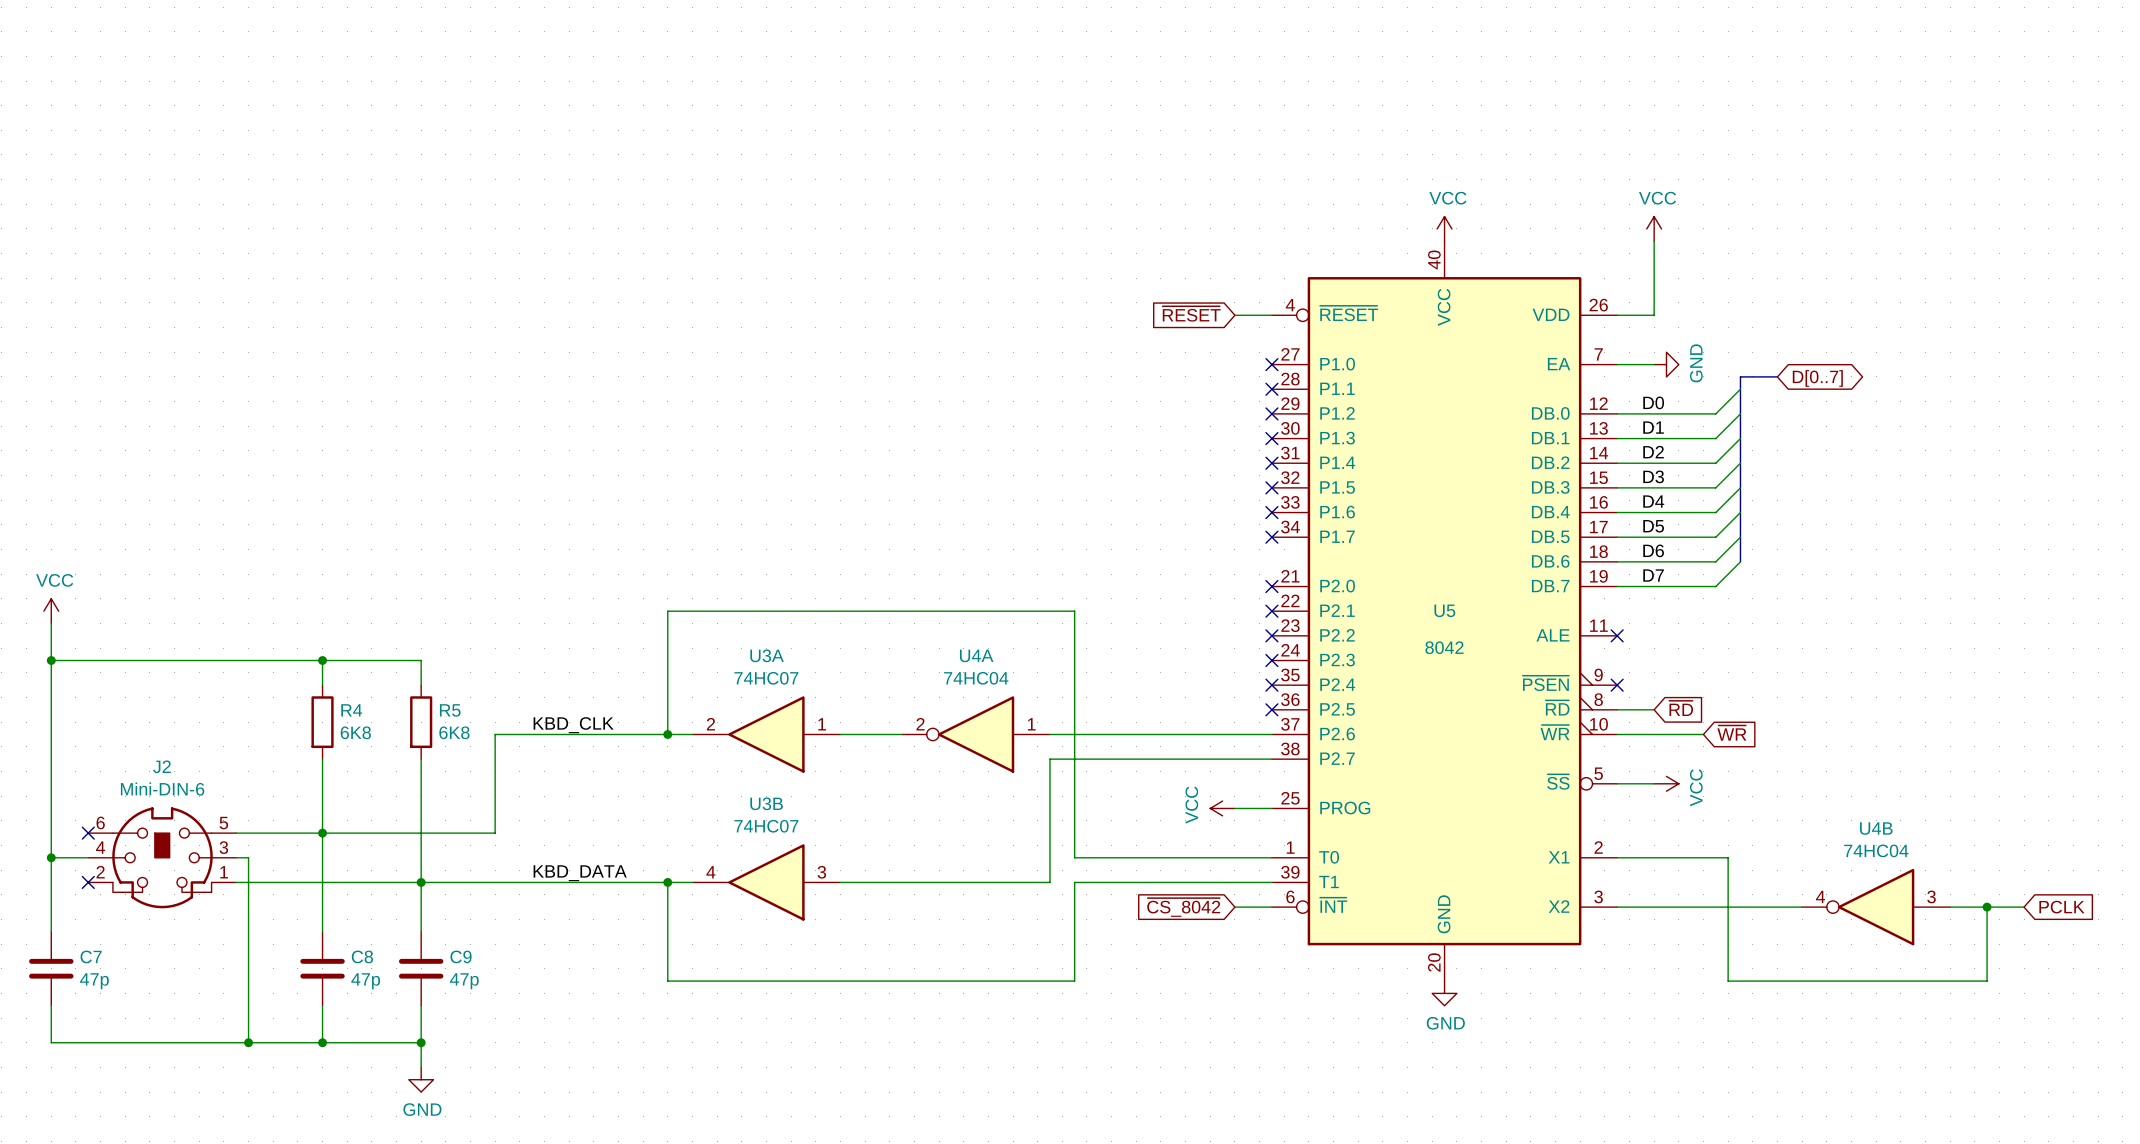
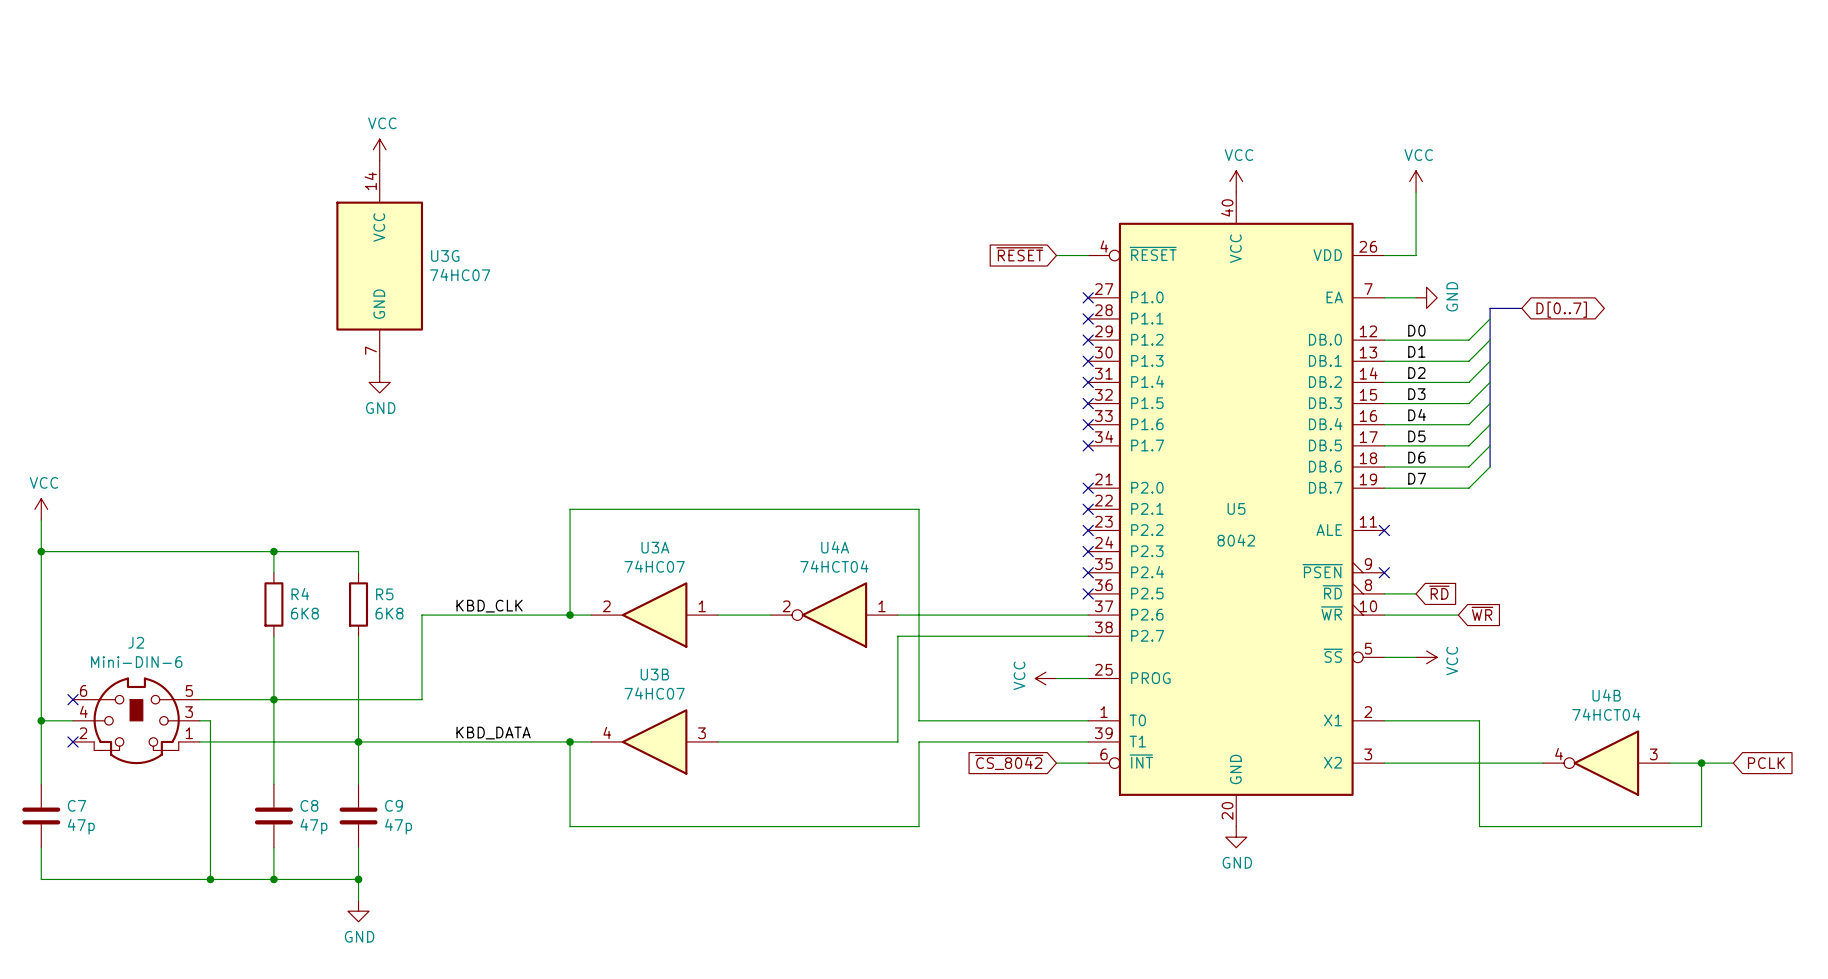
power symbol: none -> VCC (379, 149)
U3G: none -> 74HC07 (379, 266)
power symbol: none -> GND (379, 382)
U4A value: 74HC04 (976, 678) -> 74HCT04 (834, 566)
U4B value: 74HC04 (1876, 850) -> 74HCT04 (1606, 714)

